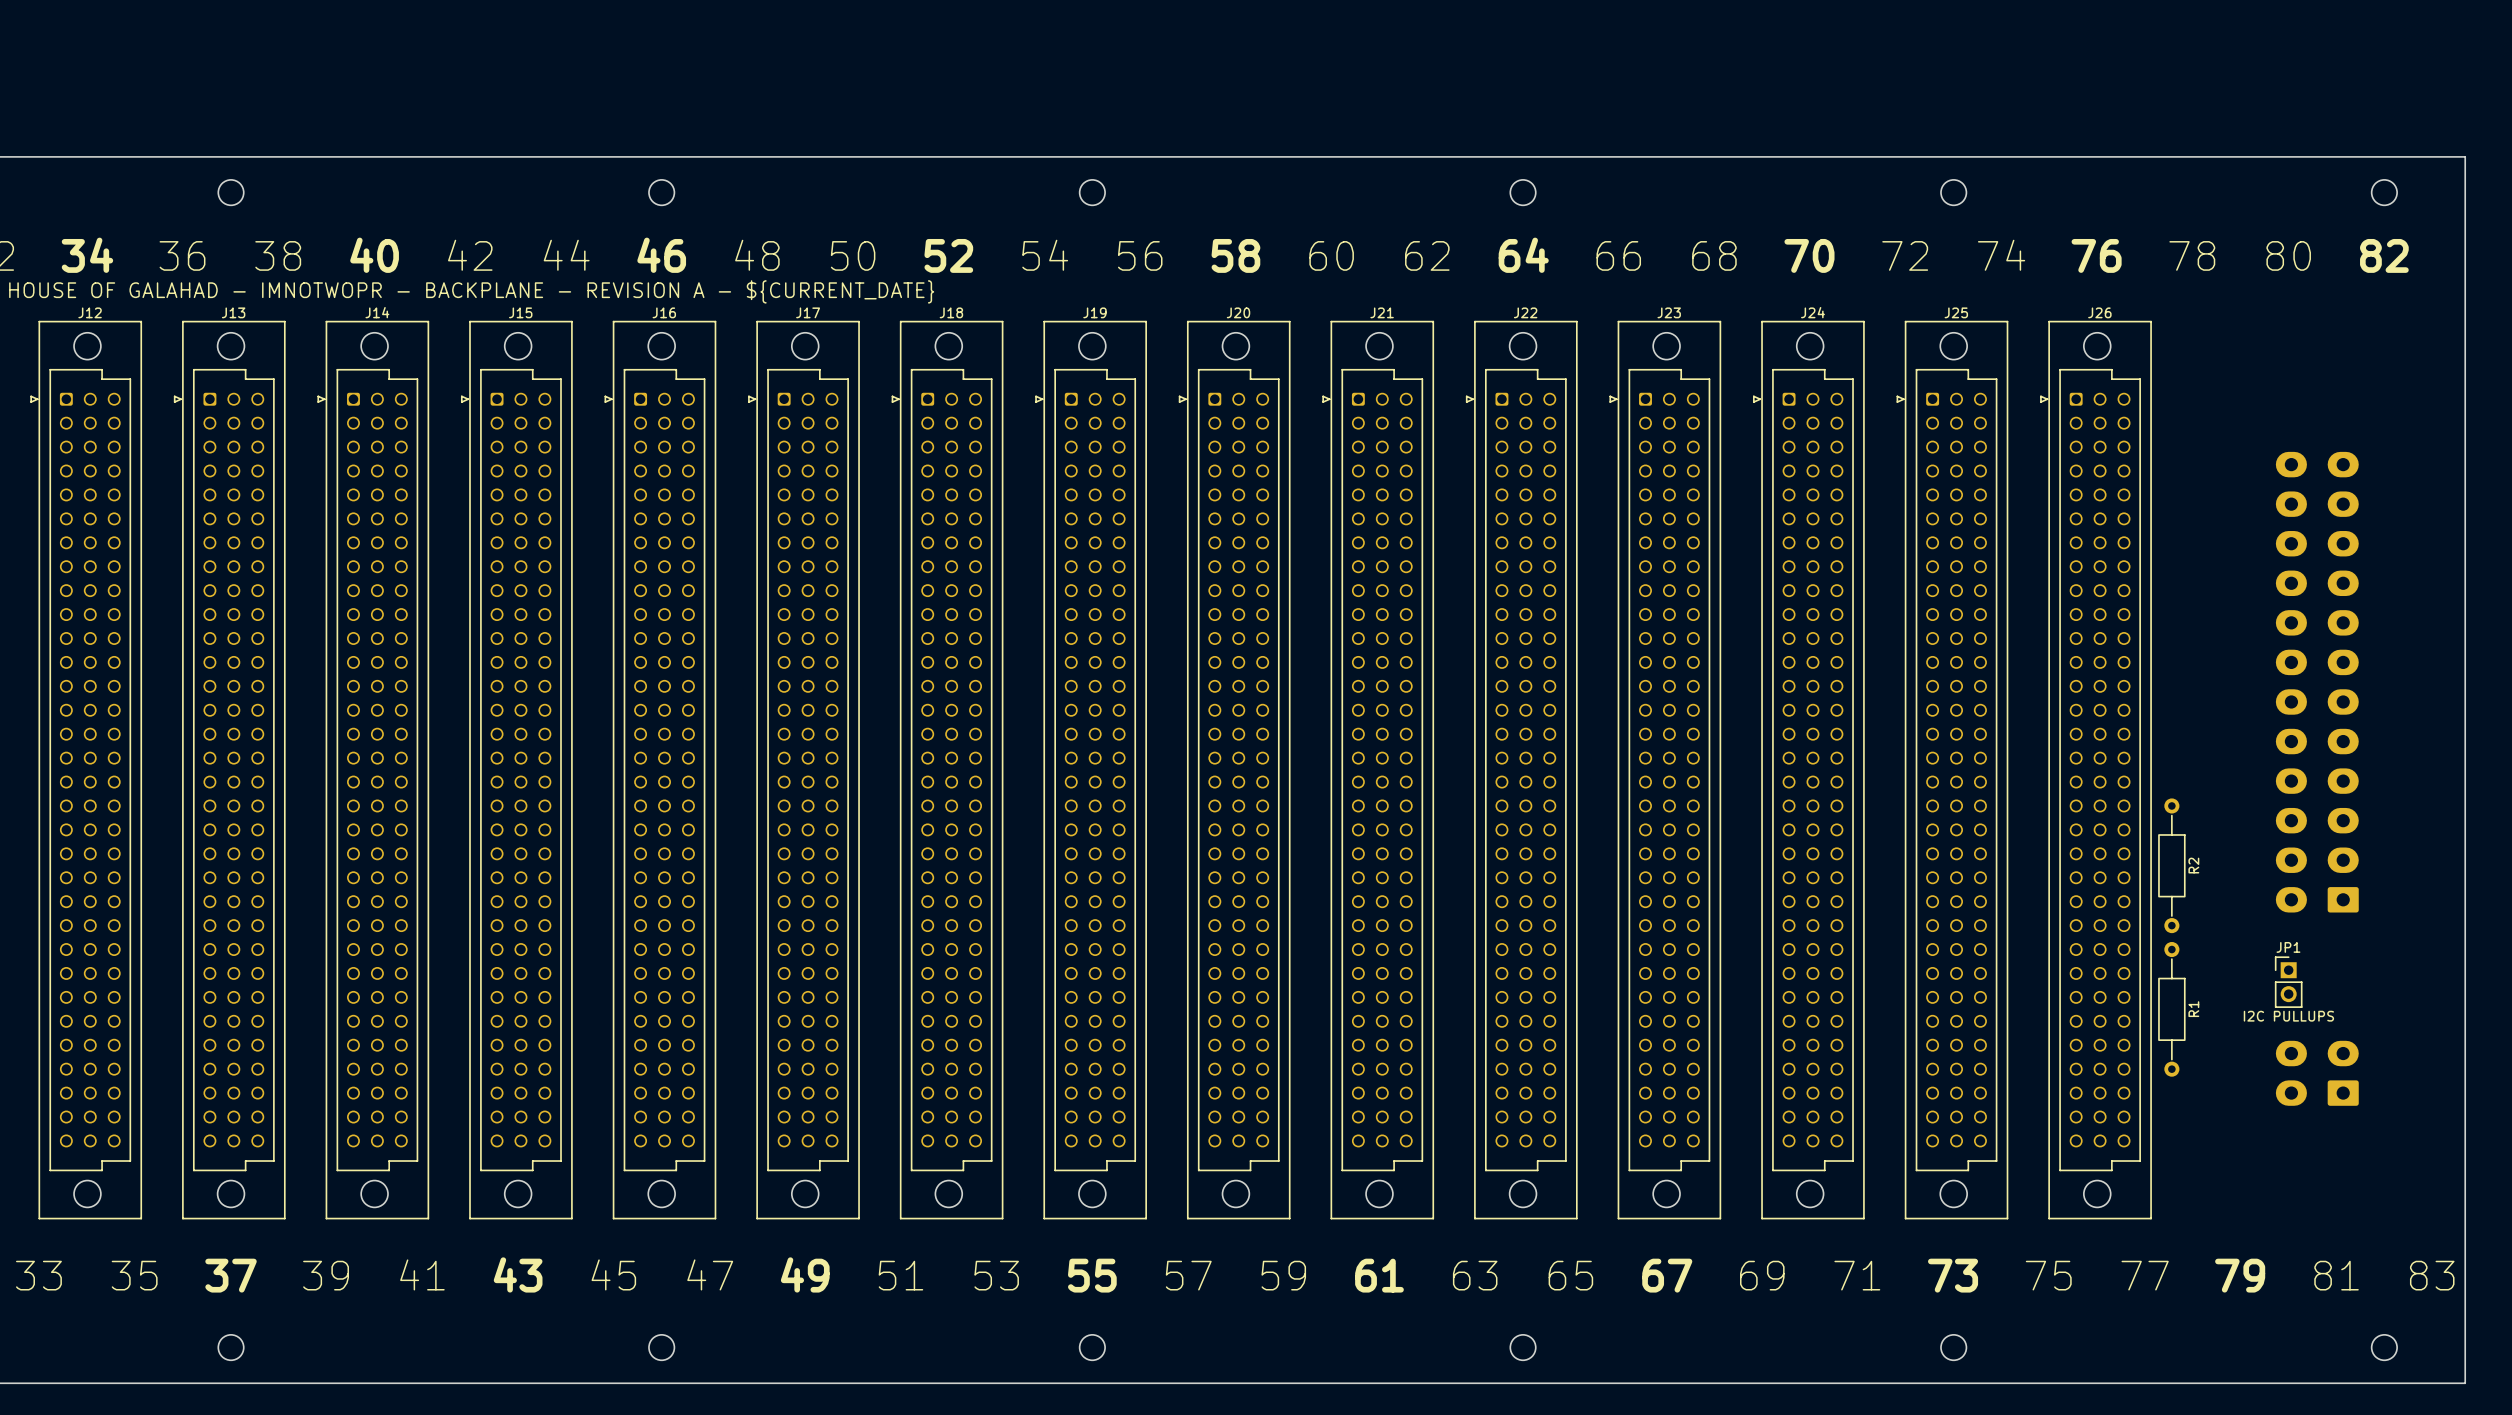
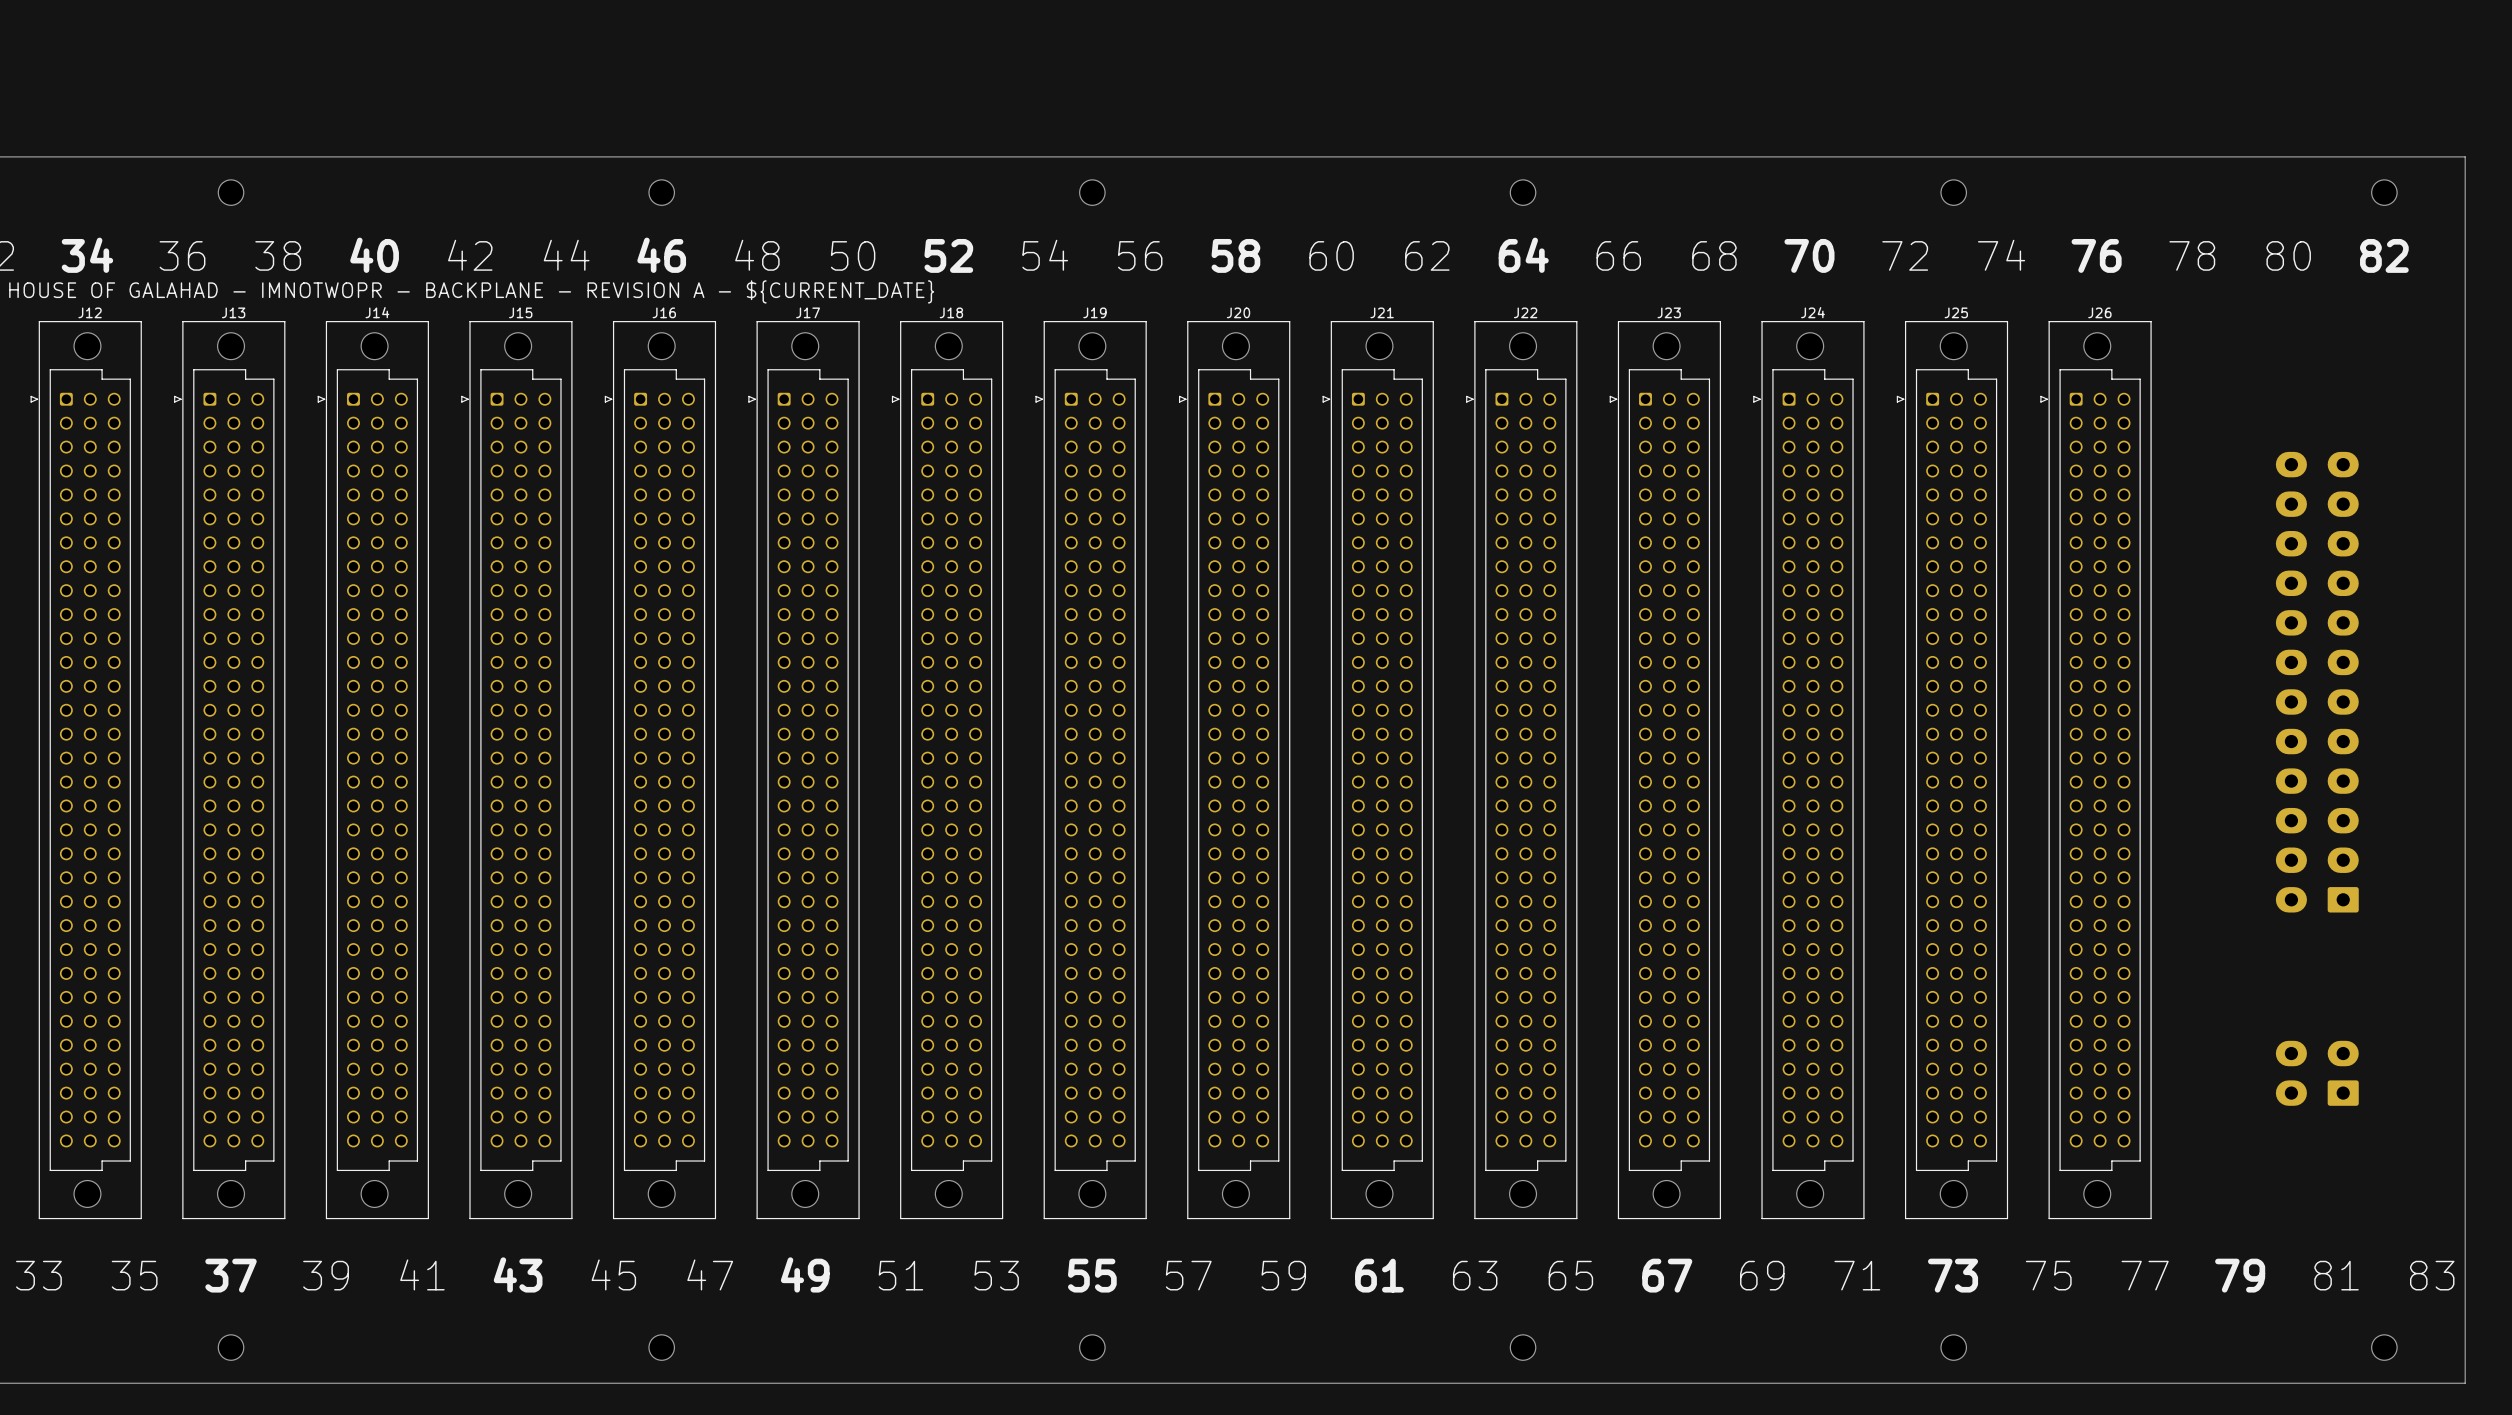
R2: (2171, 865) -> none
JP1: I2C PULLUPS (2288, 982) -> none
R1: (2171, 1009) -> none

